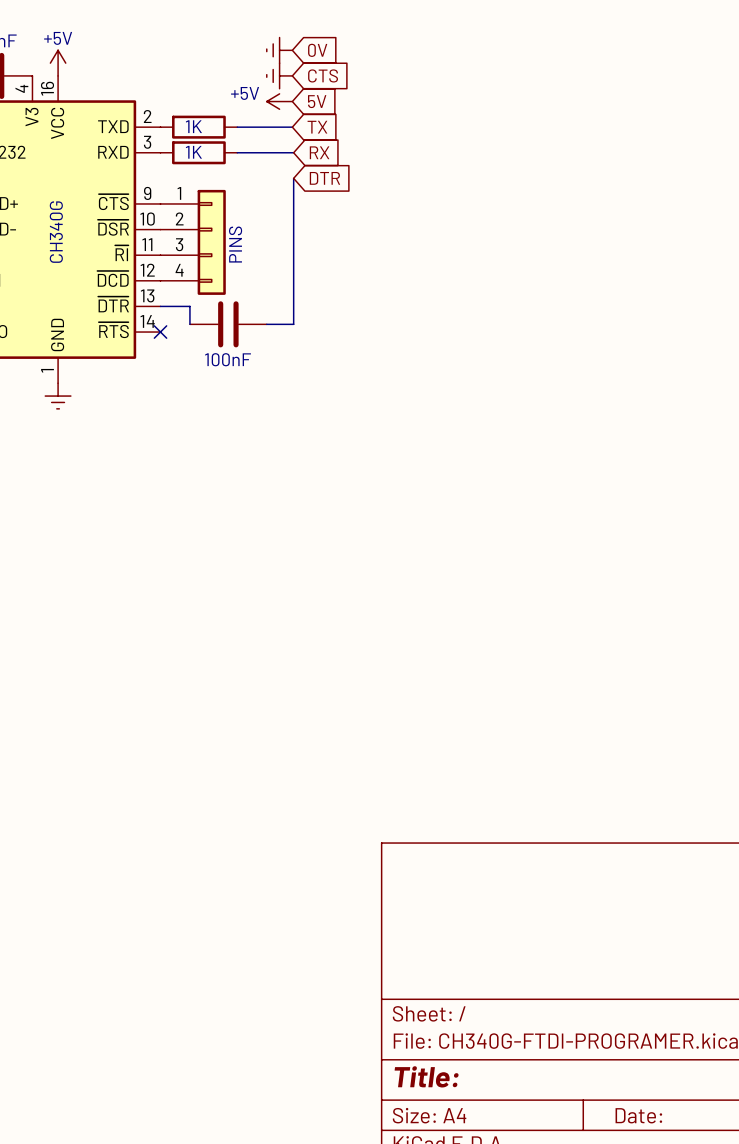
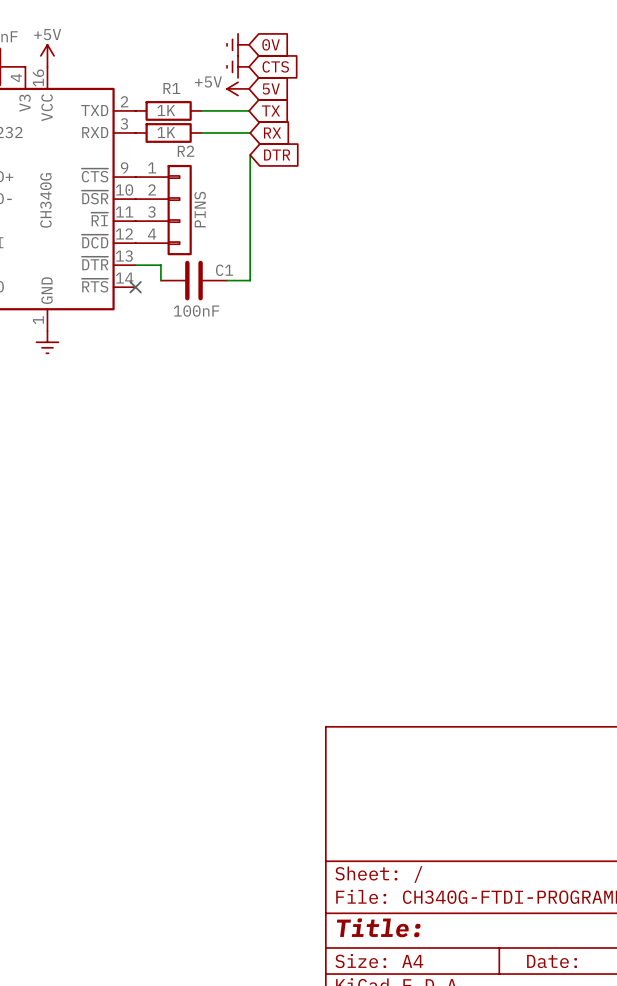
R1 name: none -> R1 (171, 88)
R2 name: none -> R2 (186, 151)
C1 name: none -> C1 (224, 270)

